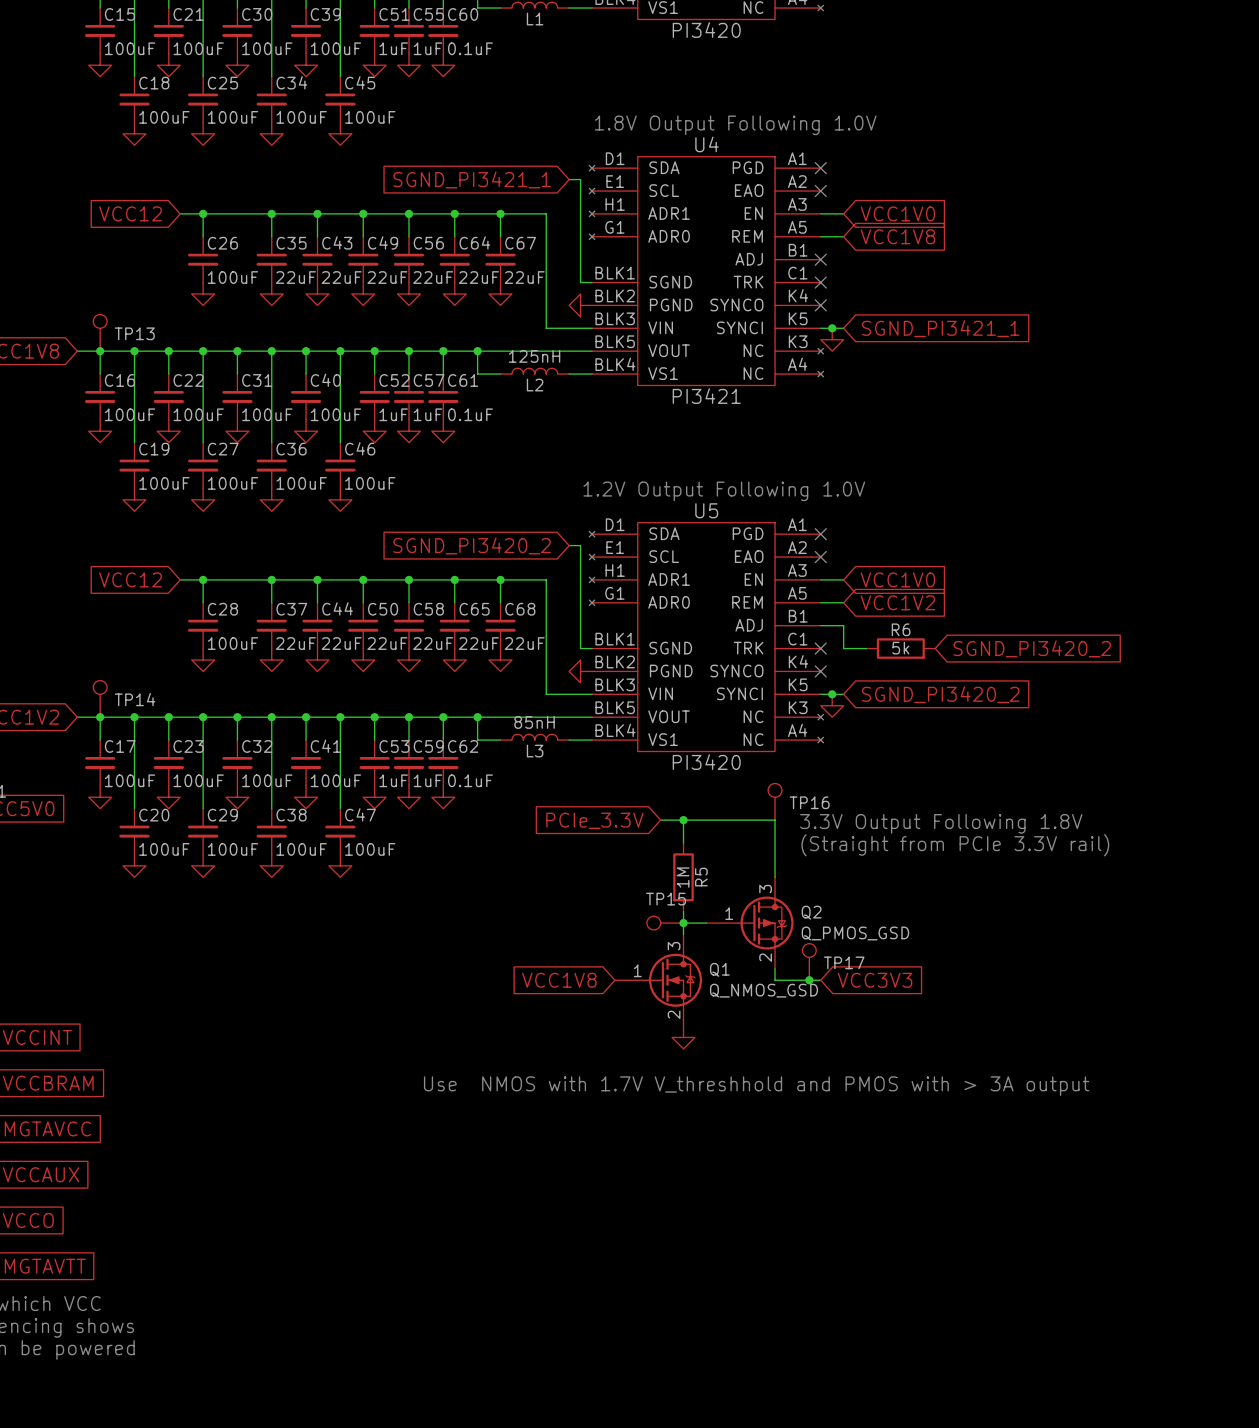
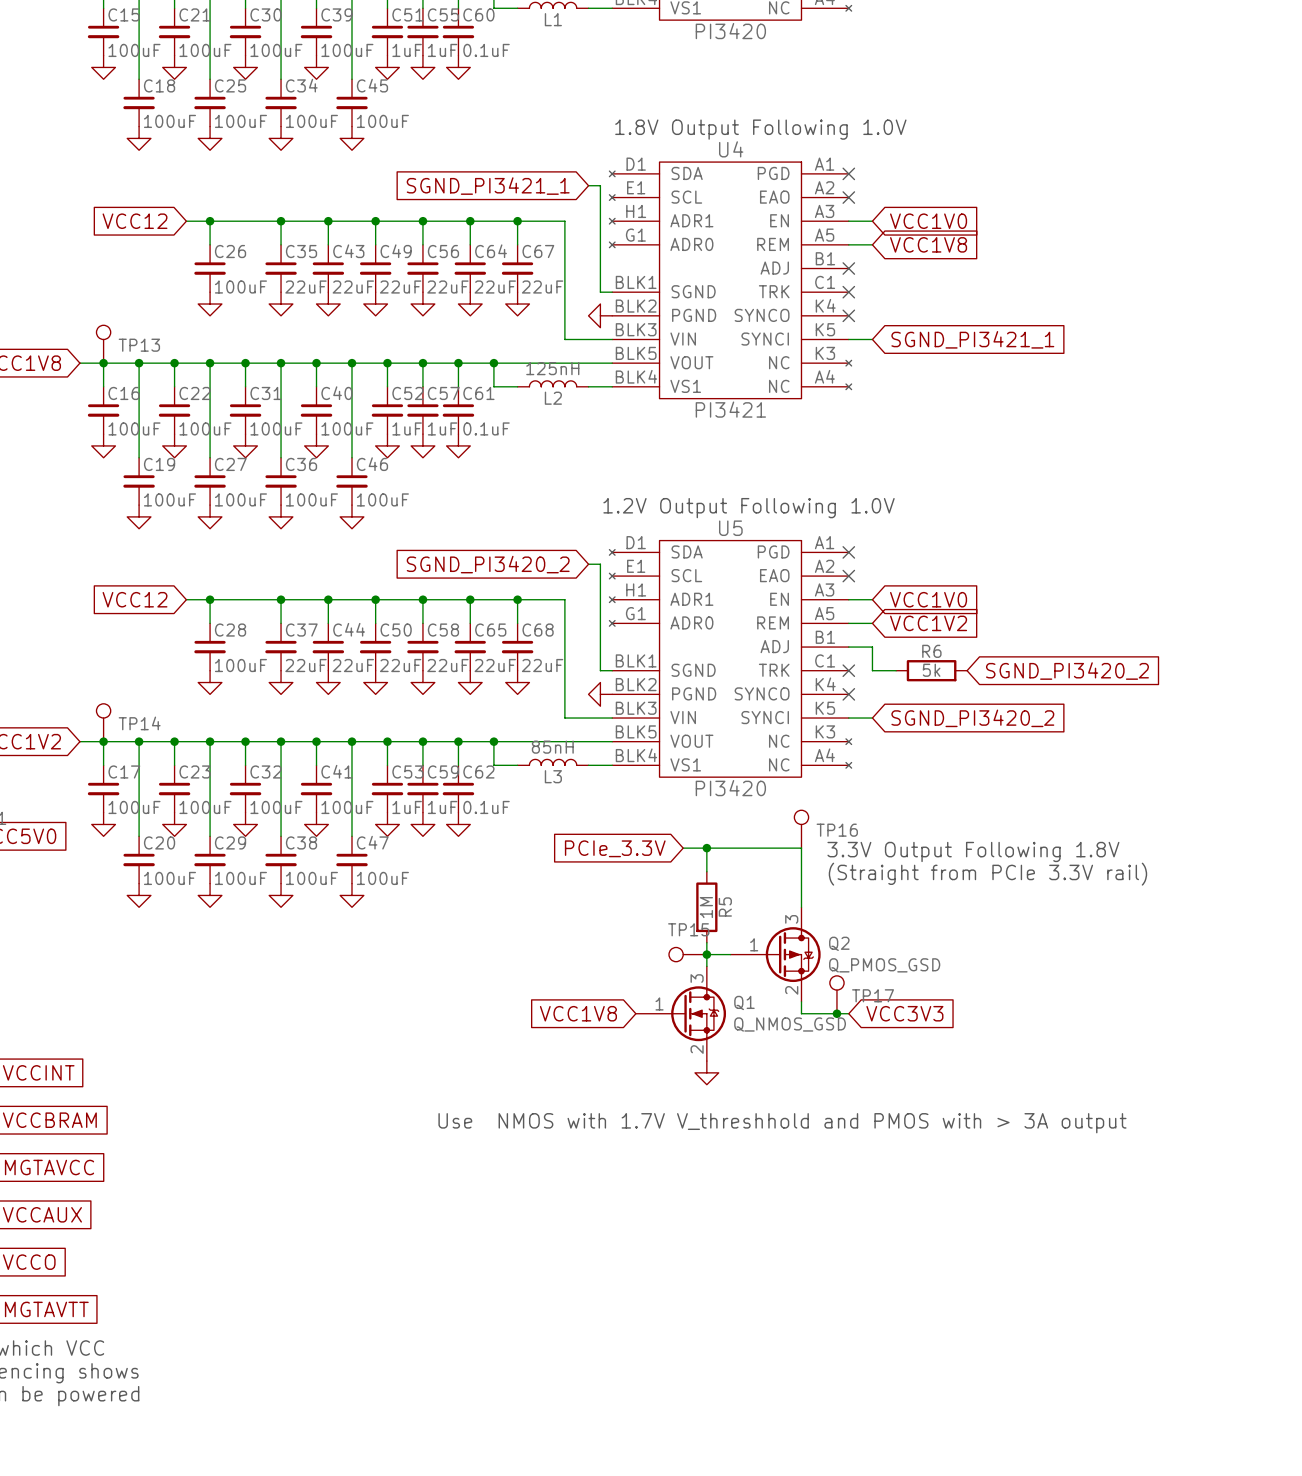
junction: (832, 328) -> none
power symbol: (832, 339) -> none
junction: (832, 694) -> none
power symbol: (832, 705) -> none

